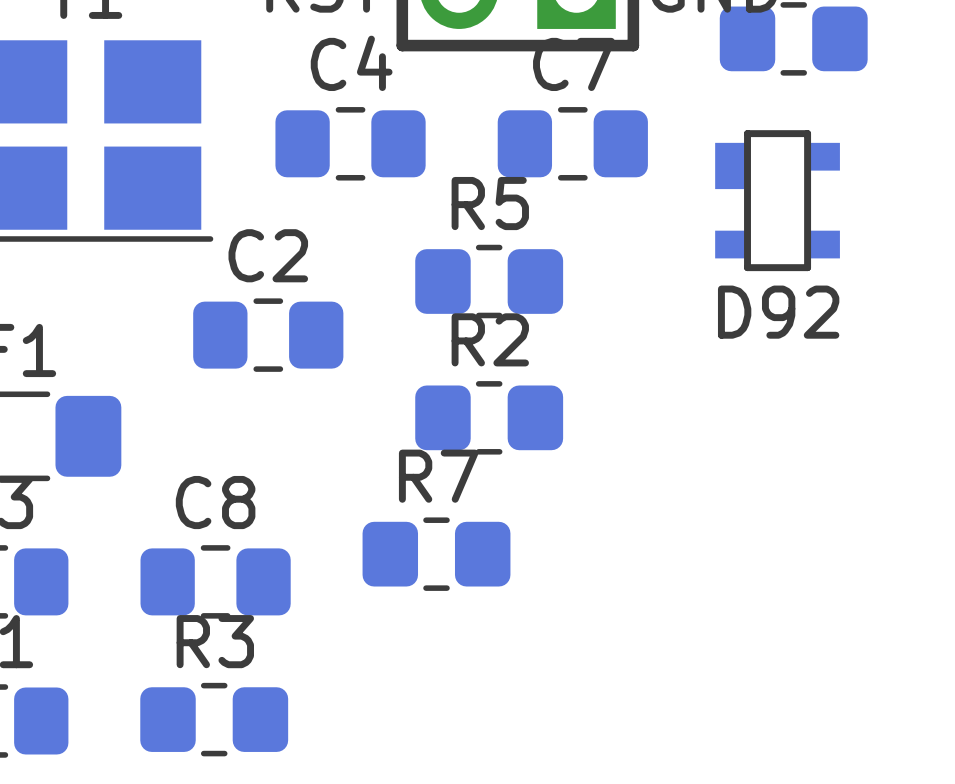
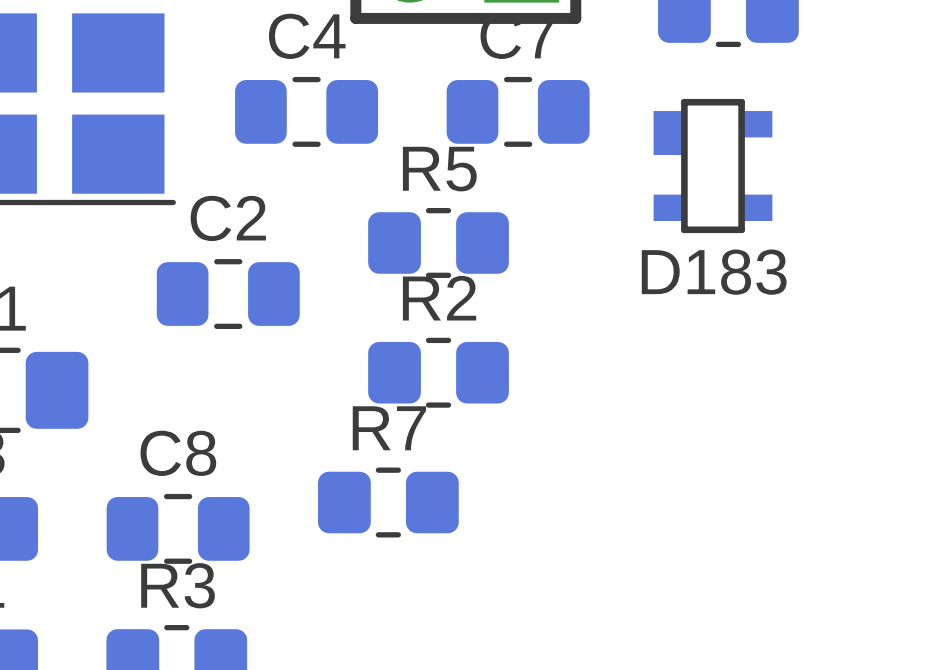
D92 name: D92 (778, 312) -> D183 (714, 272)

